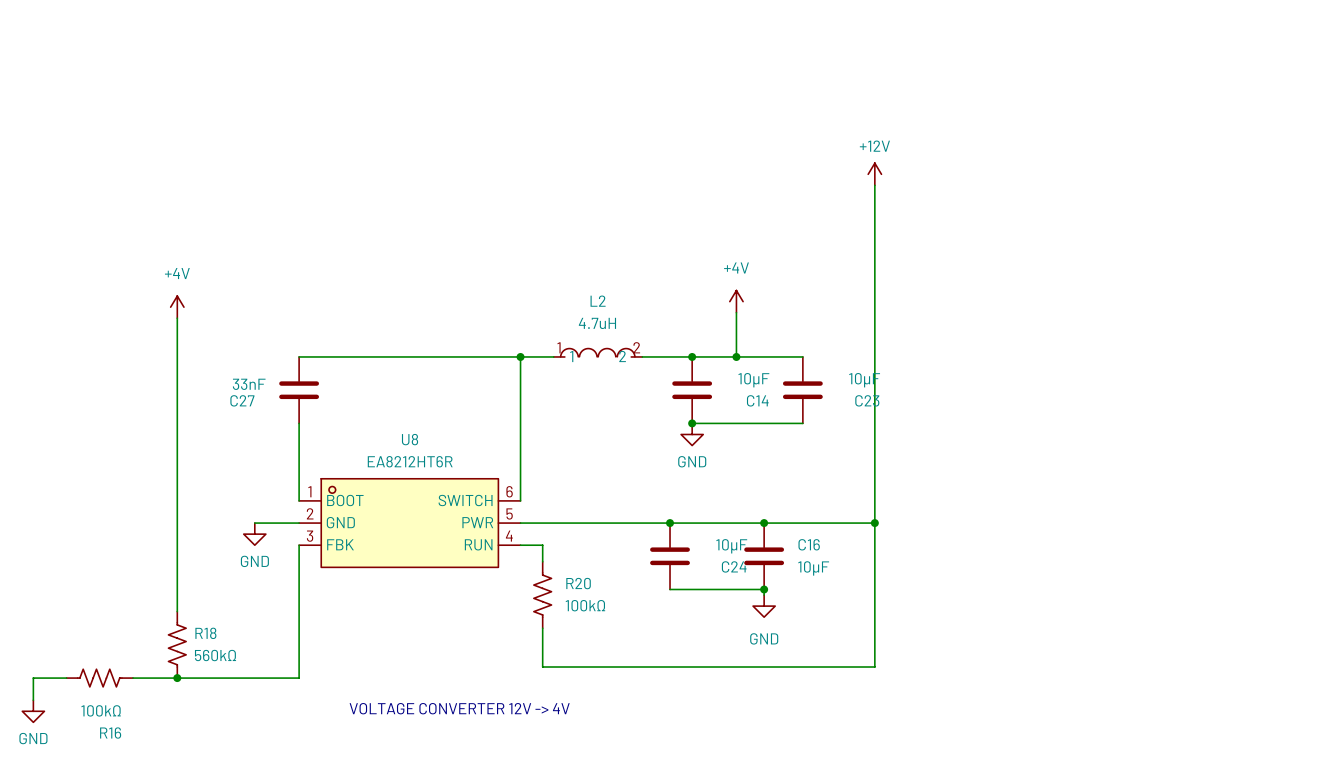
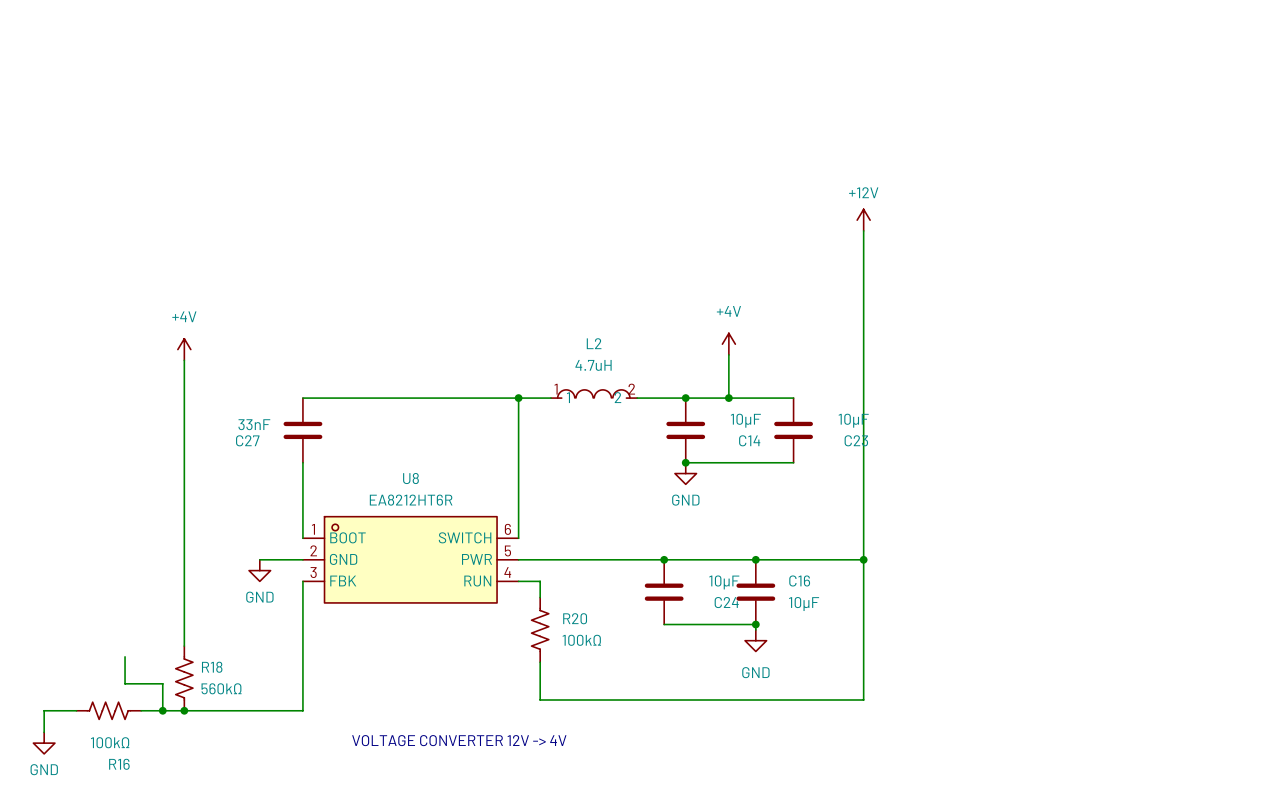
wire: none -> (125, 656) (125, 683) (162, 683) (162, 710)
junction: none -> (162, 710)

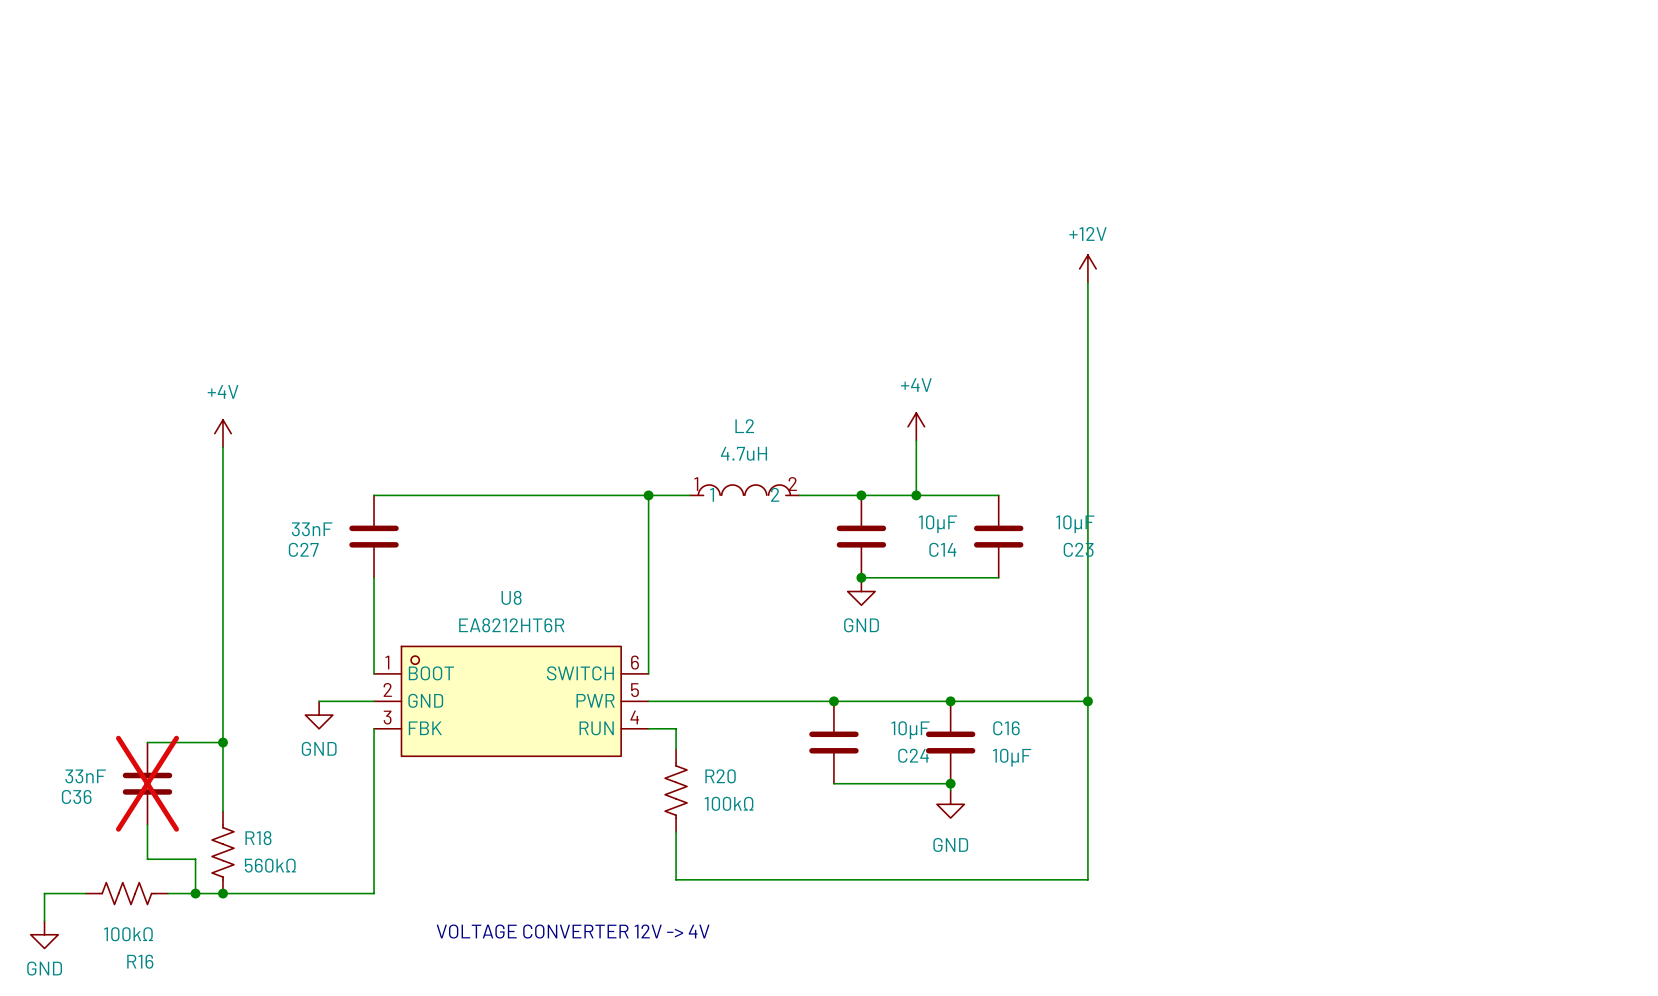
wire: none -> (147, 742) (222, 742)
junction: none -> (222, 742)
C36: none -> 33nF (147, 783)

